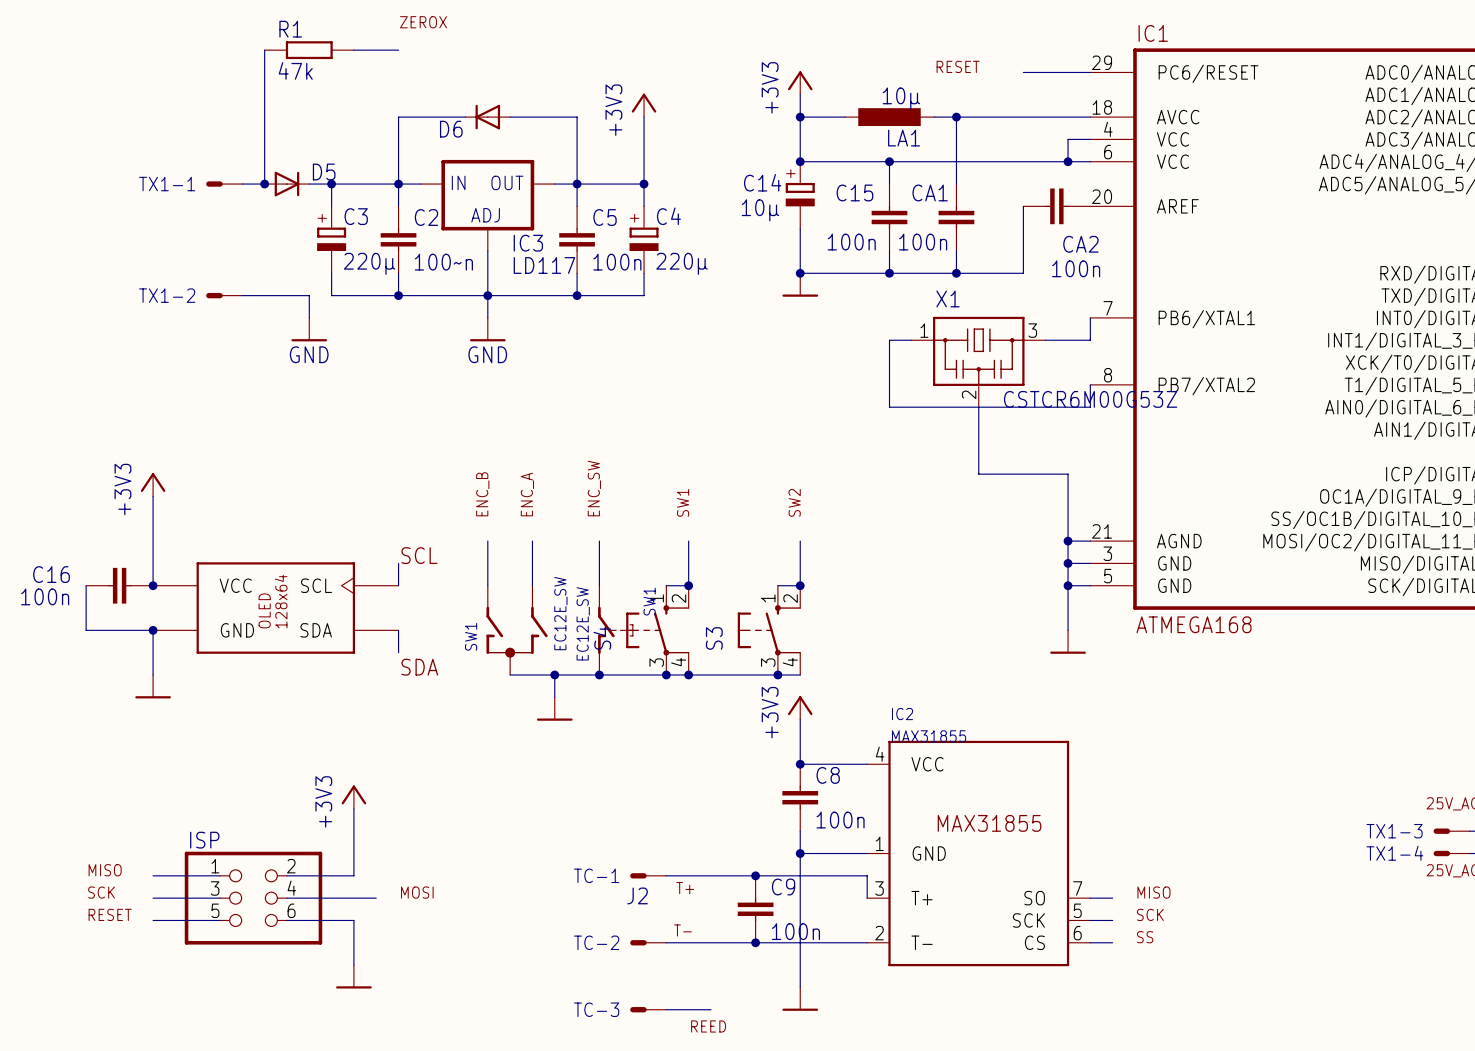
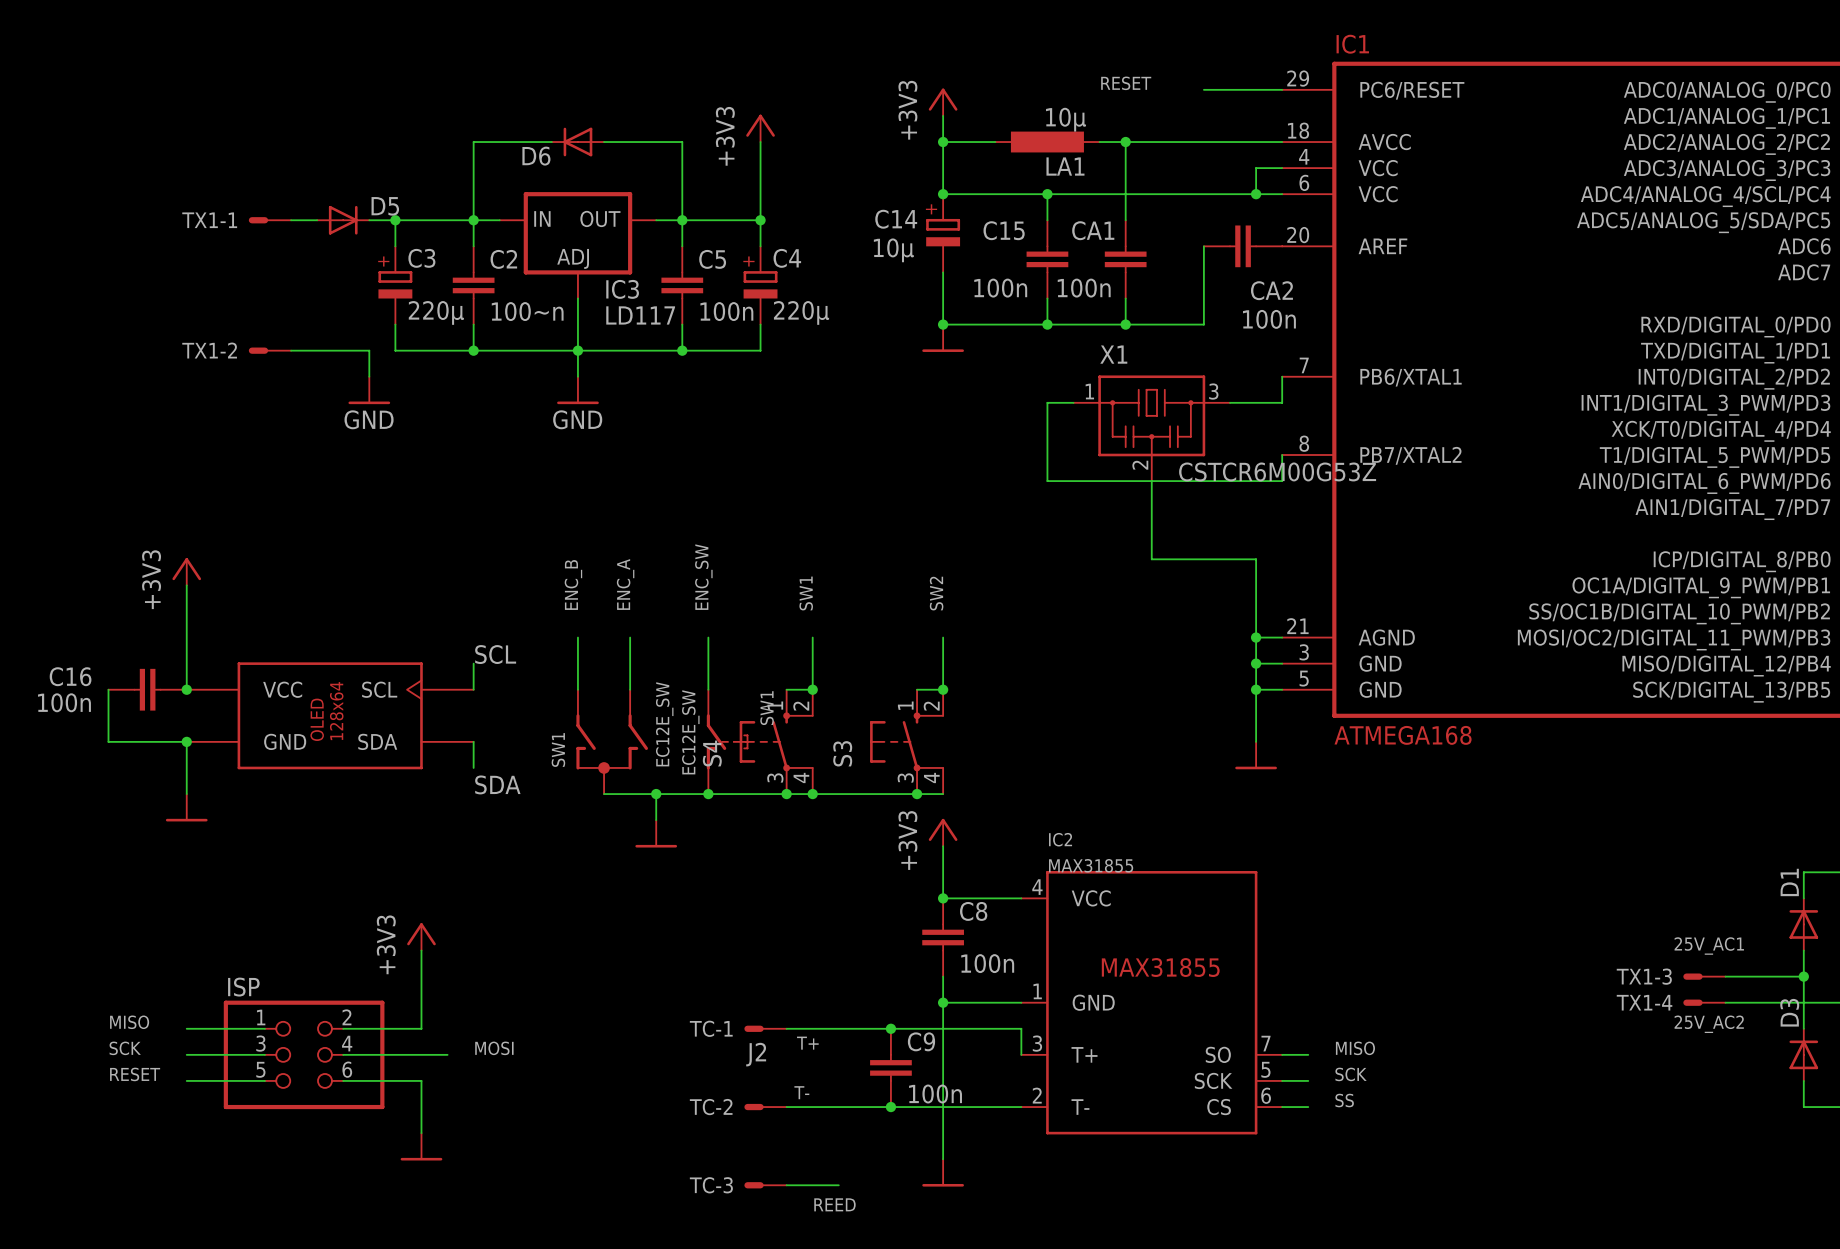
label: ZEROX (423, 22) -> none
wire: (264, 50) (264, 184) -> none
R1: 47k (309, 50) -> none
wire: (353, 50) (398, 50) -> none
junction: (264, 184) -> none

